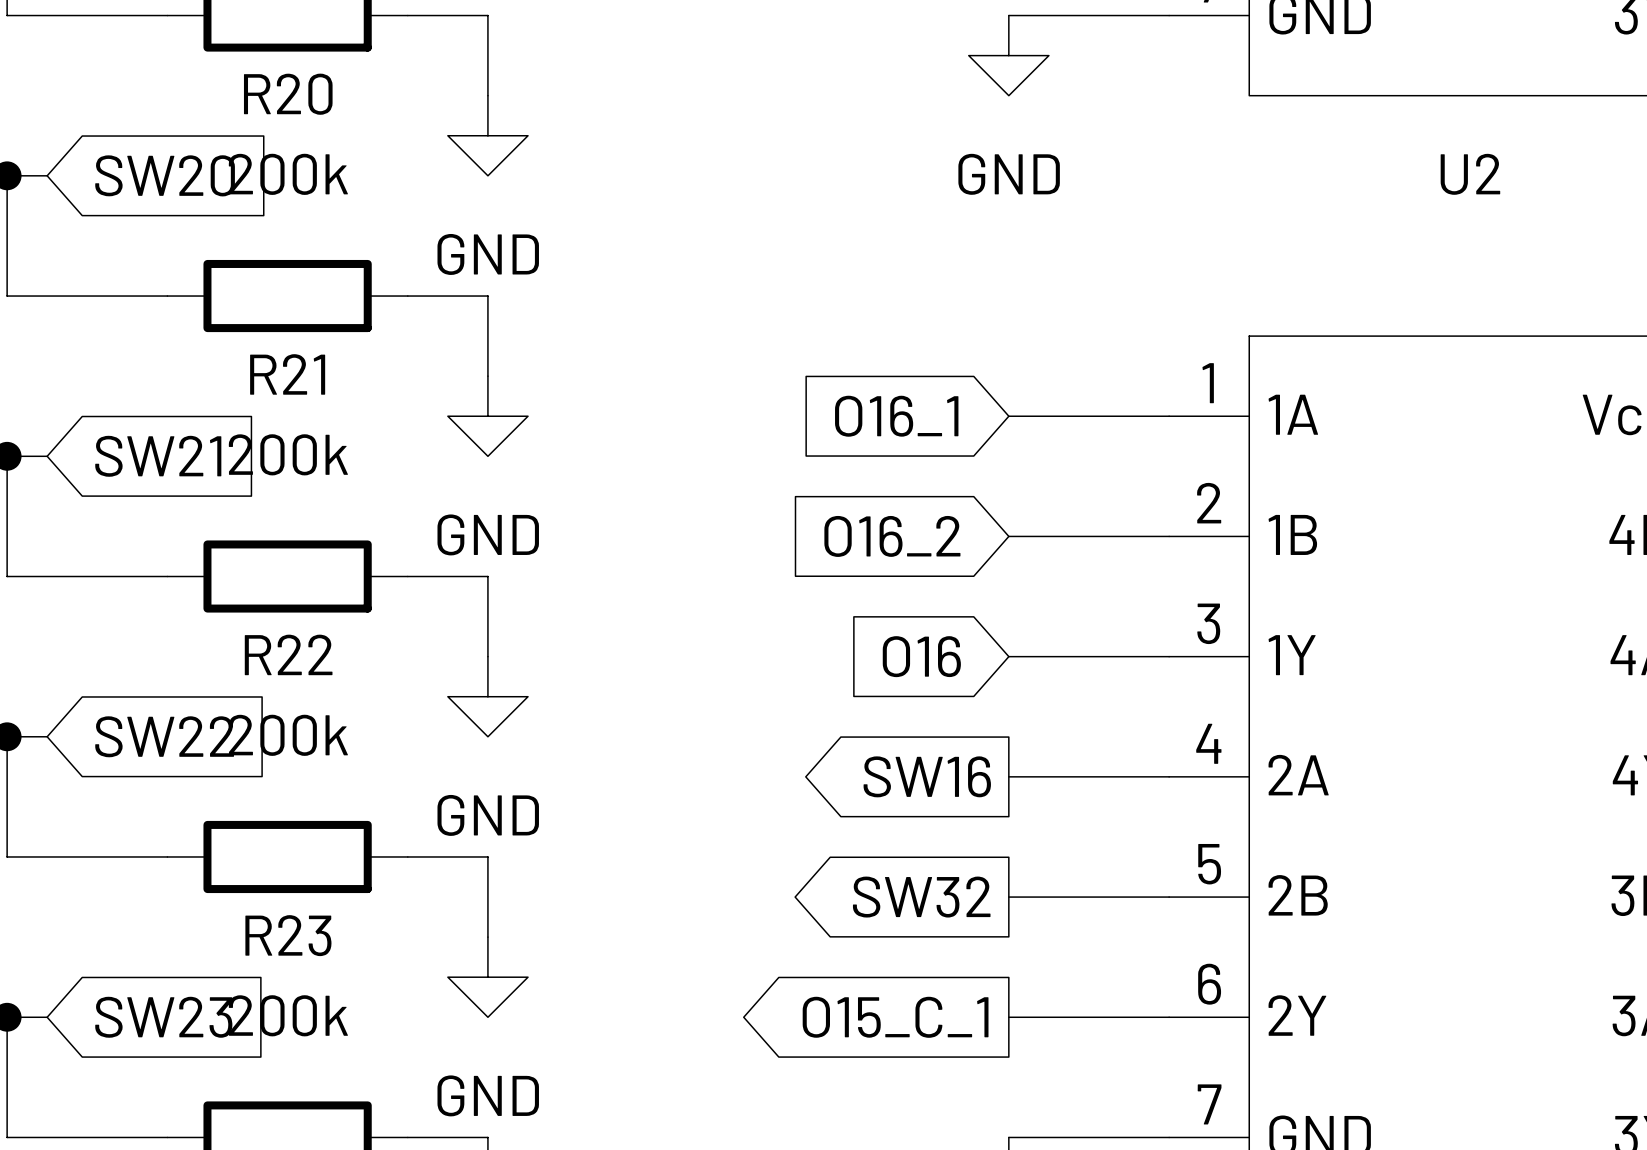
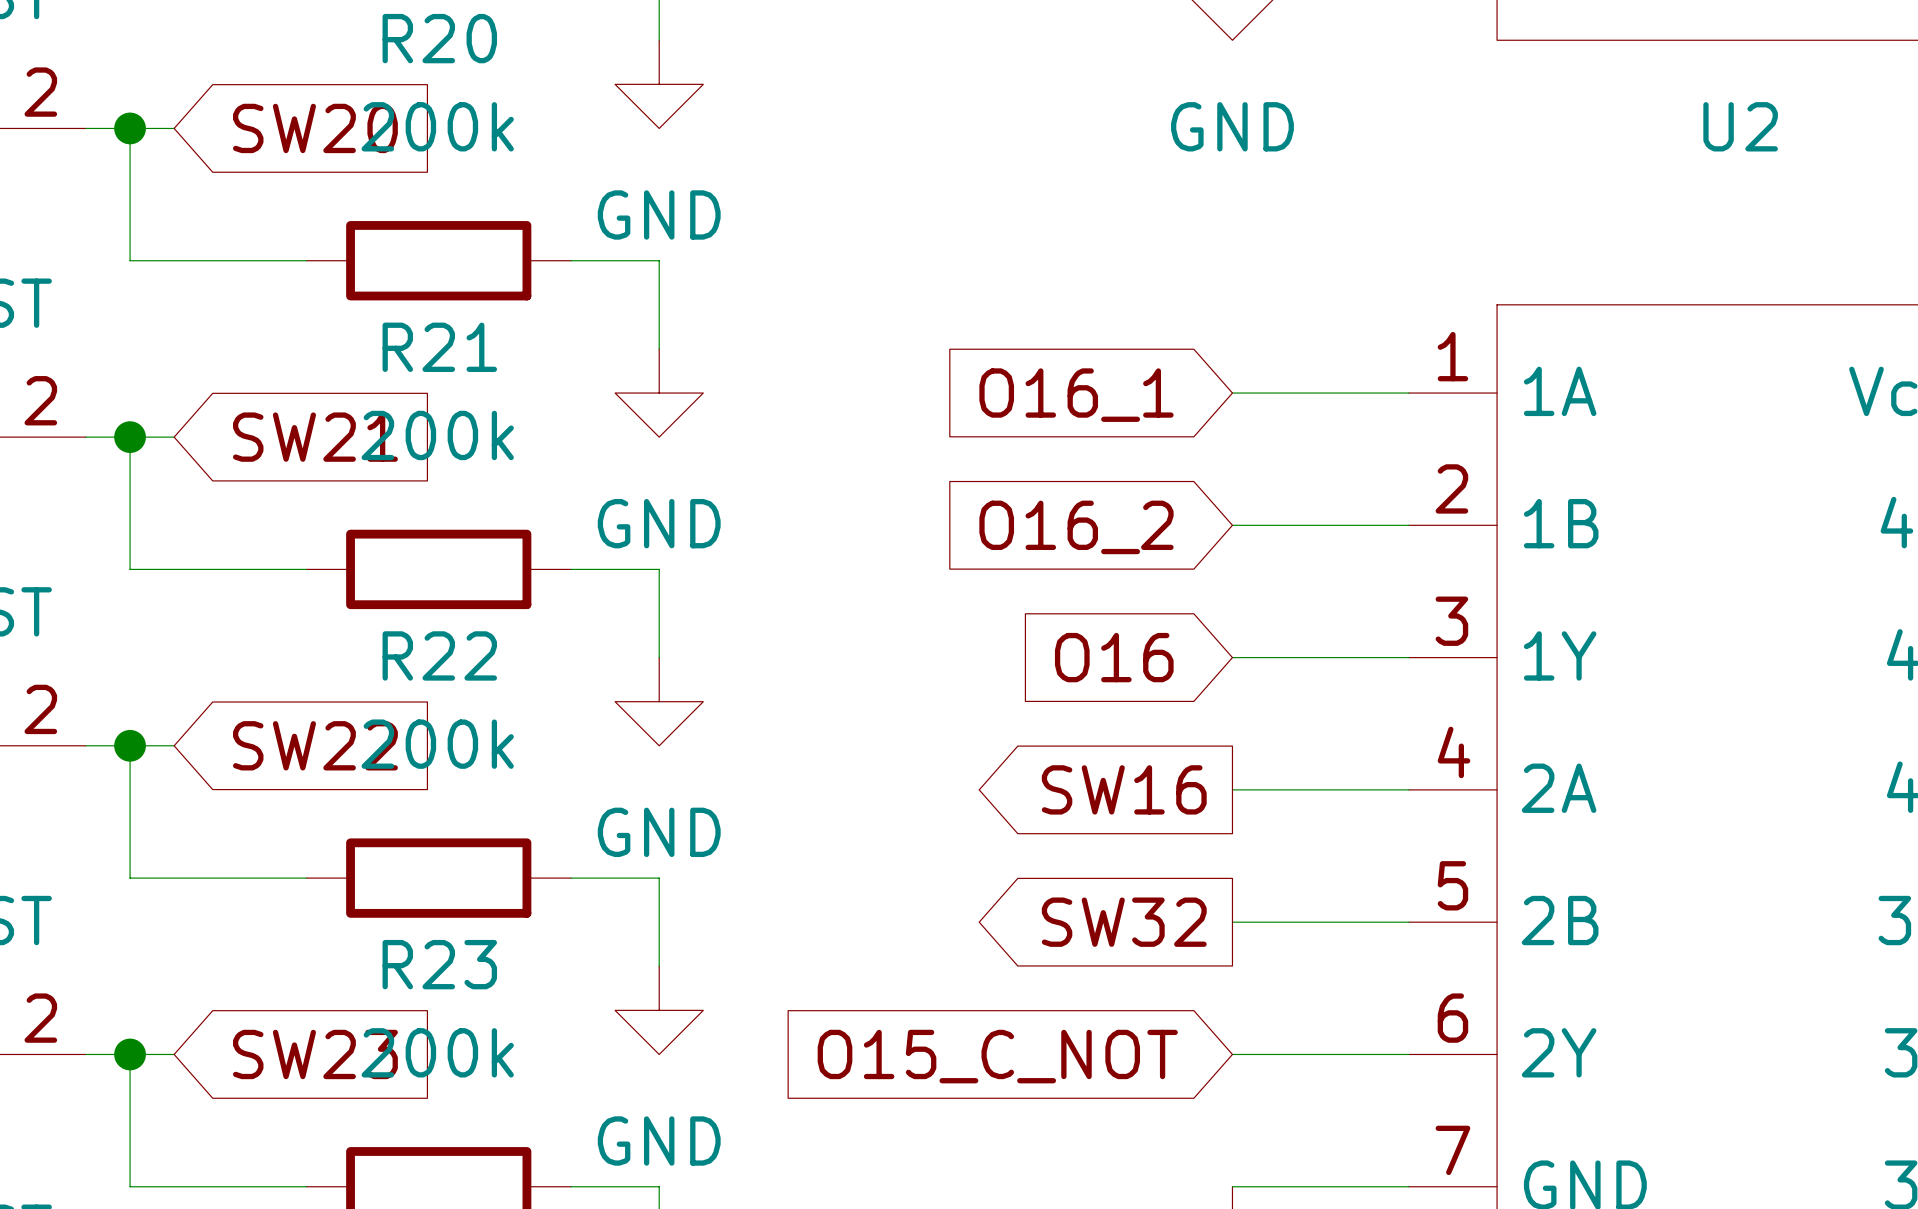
global label shape: output (895, 1017) -> input (997, 1056)
global label: O15_C_1 (895, 1017) -> O15_C_NOT (997, 1056)

